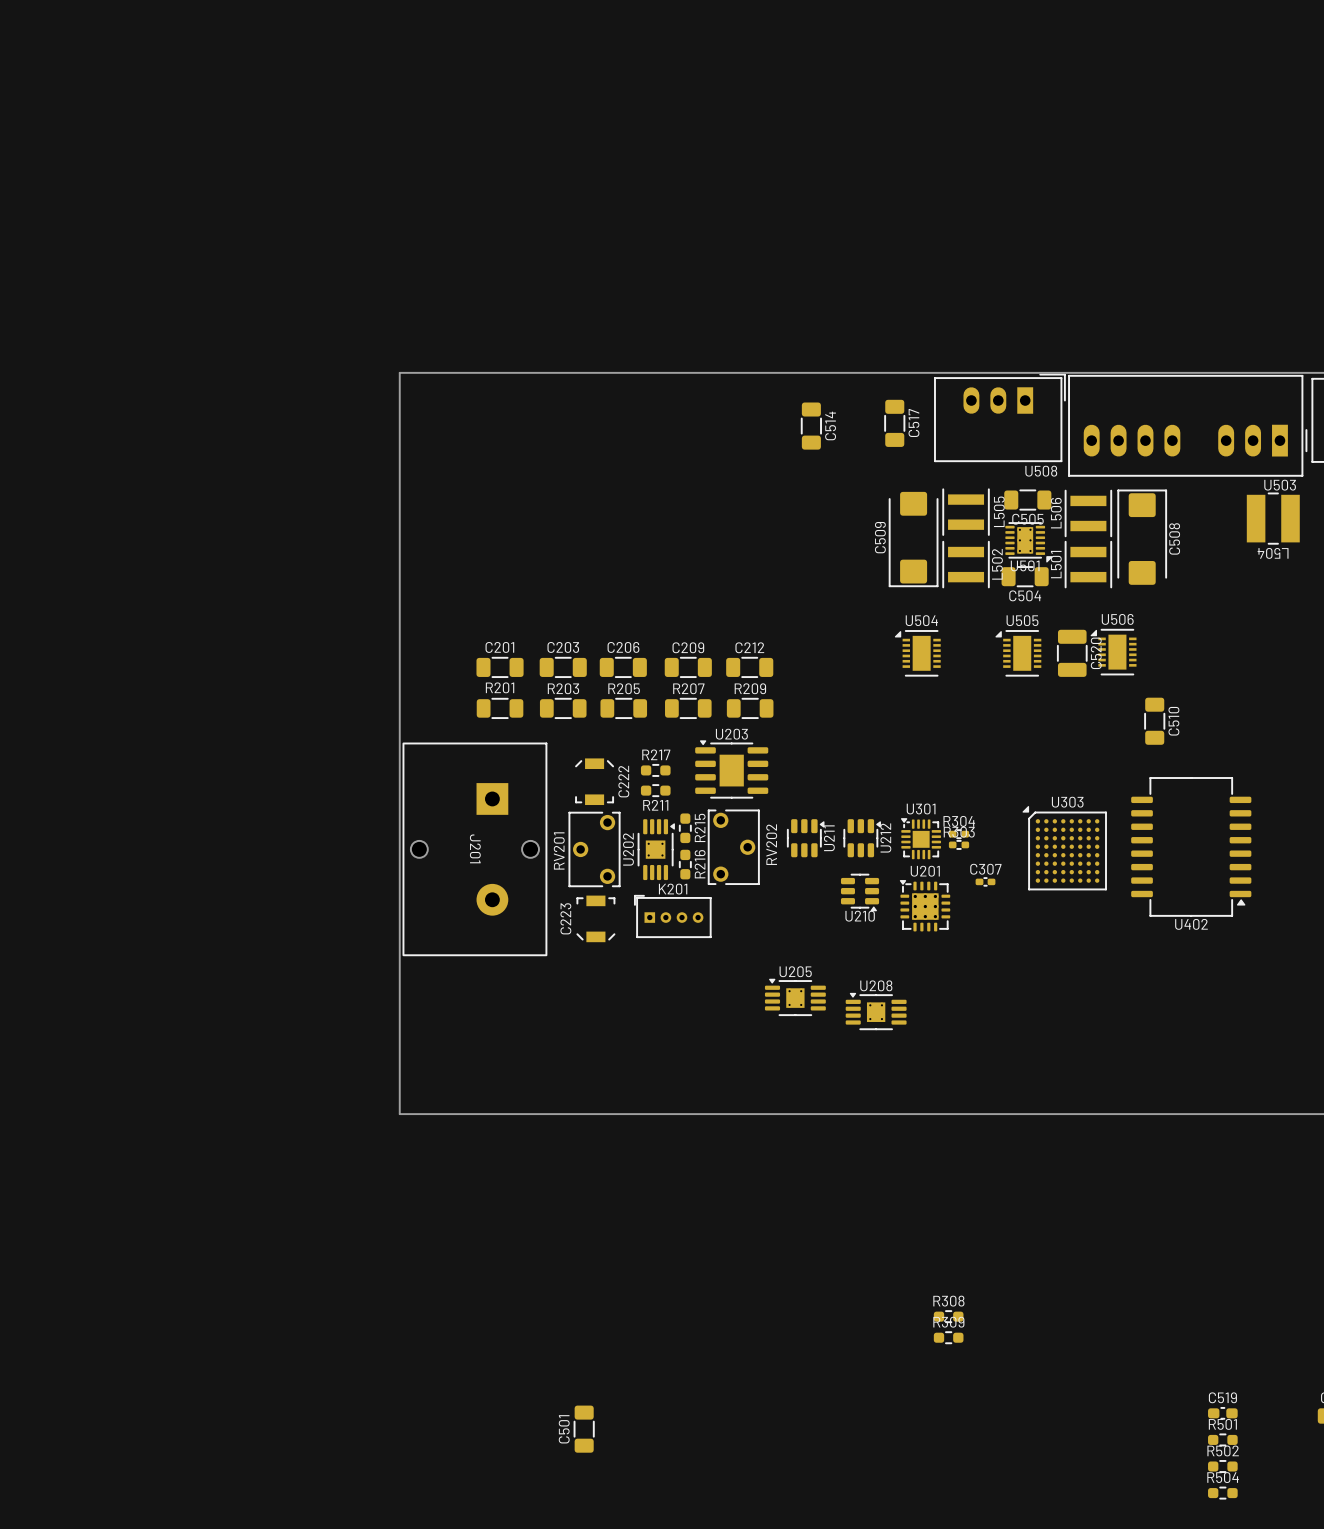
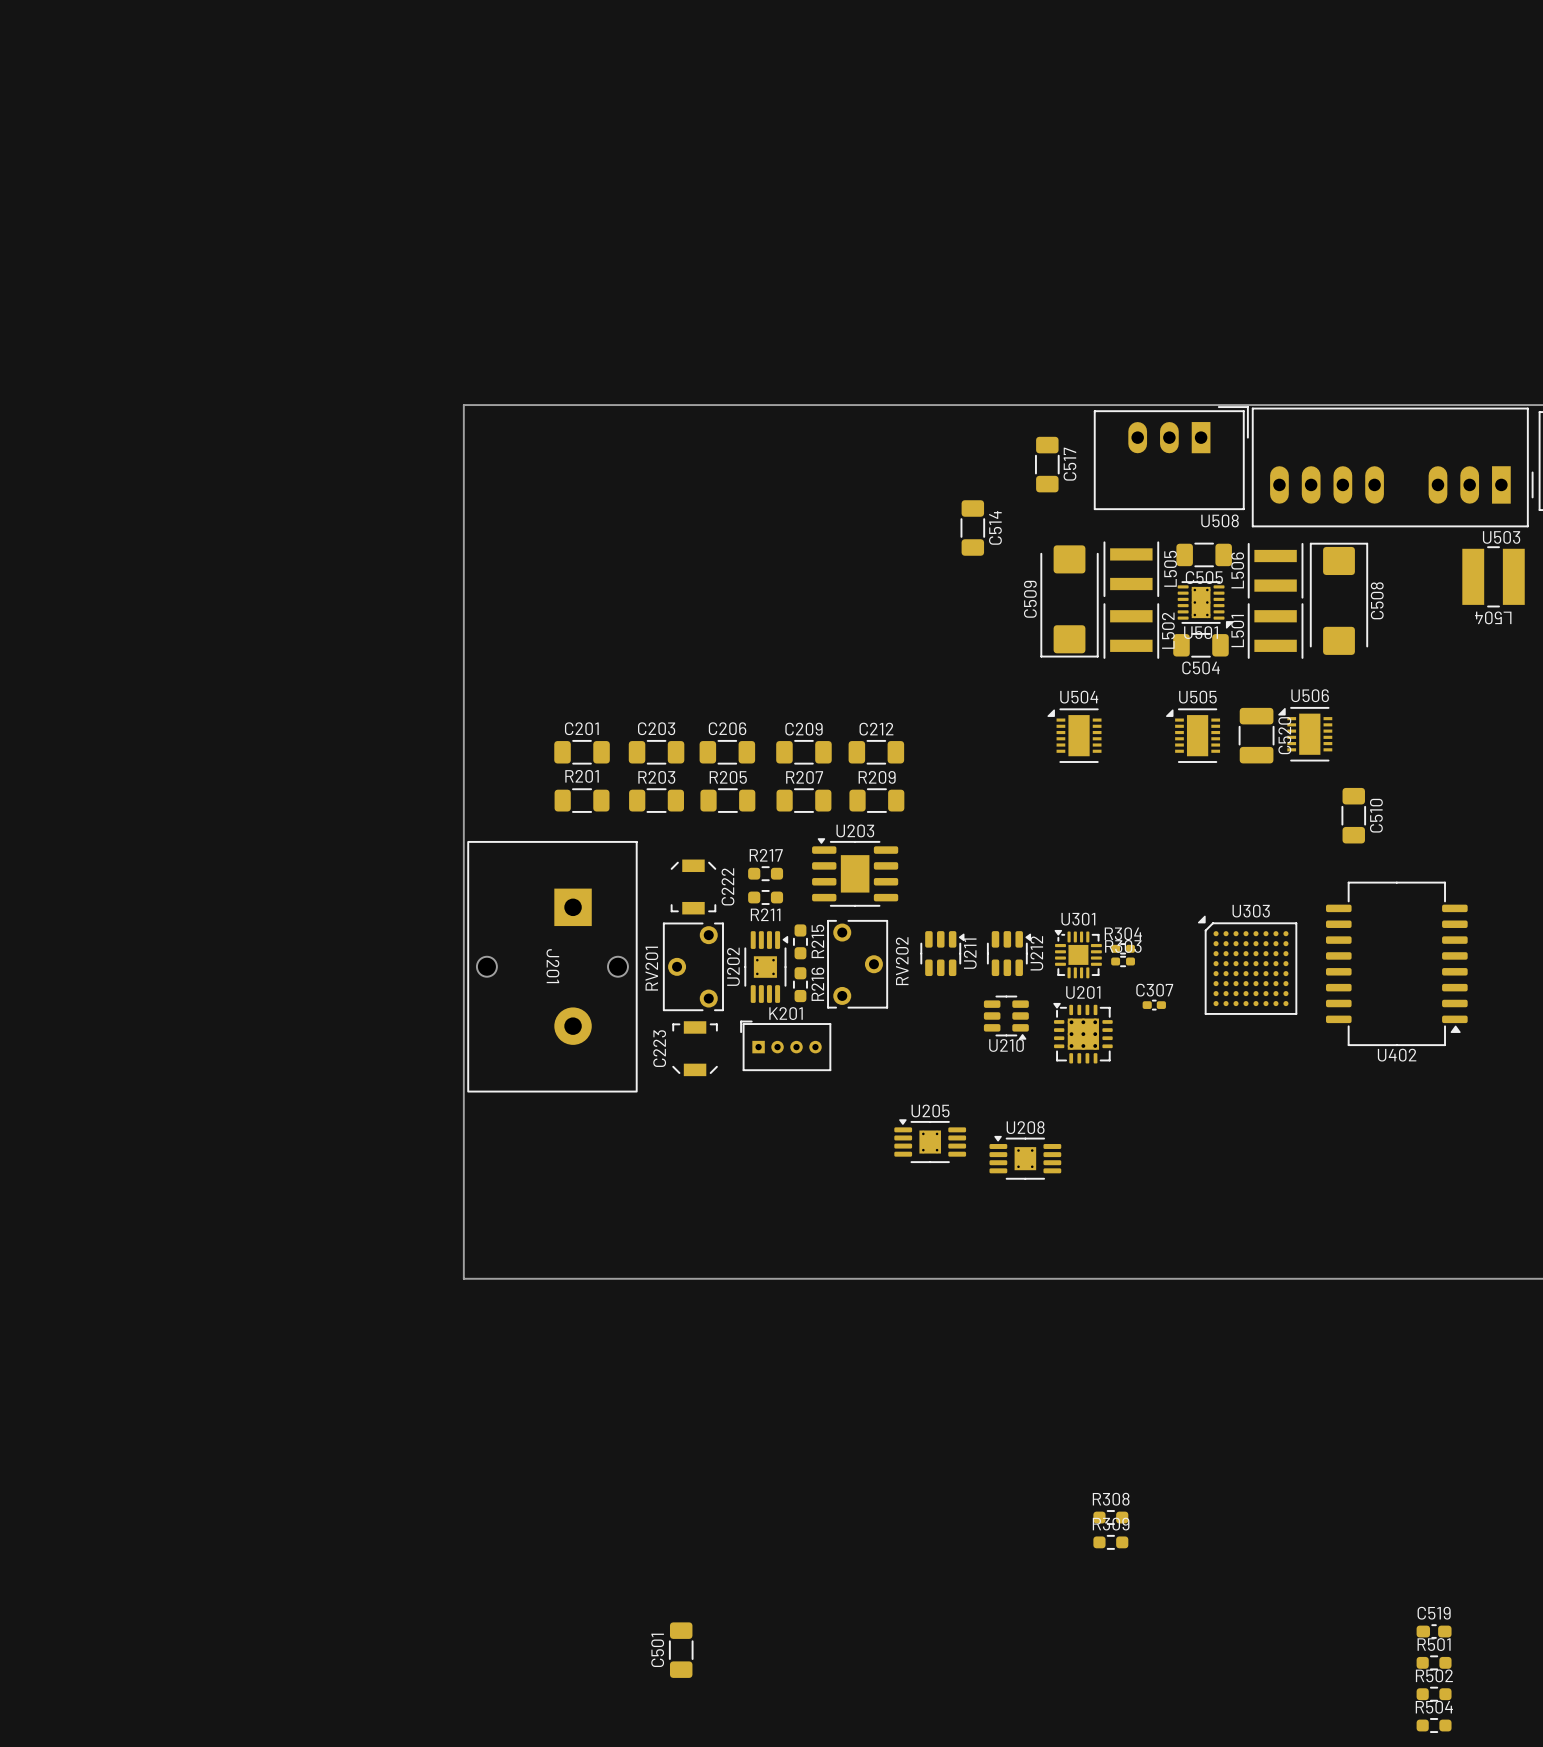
C514 position: (811, 426) -> (972, 528)

